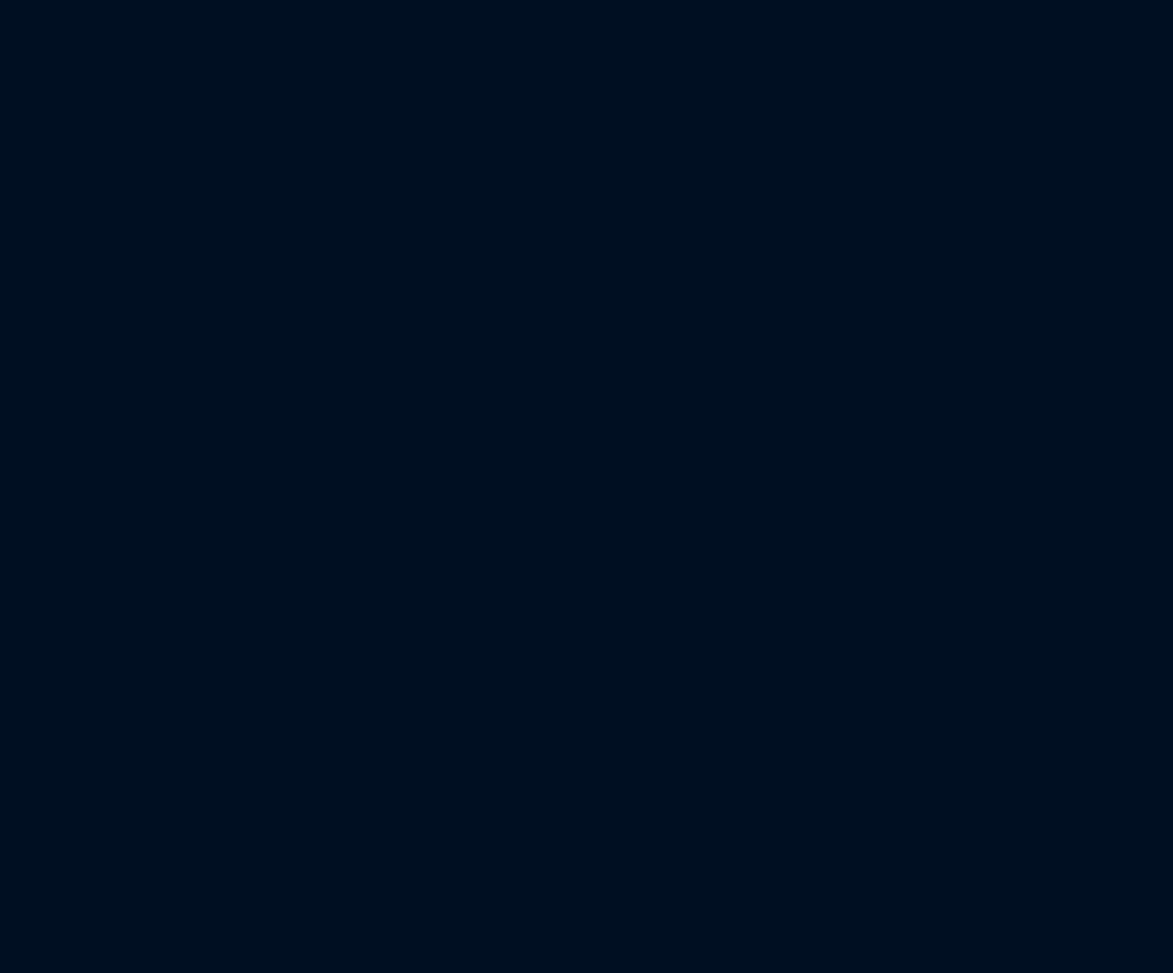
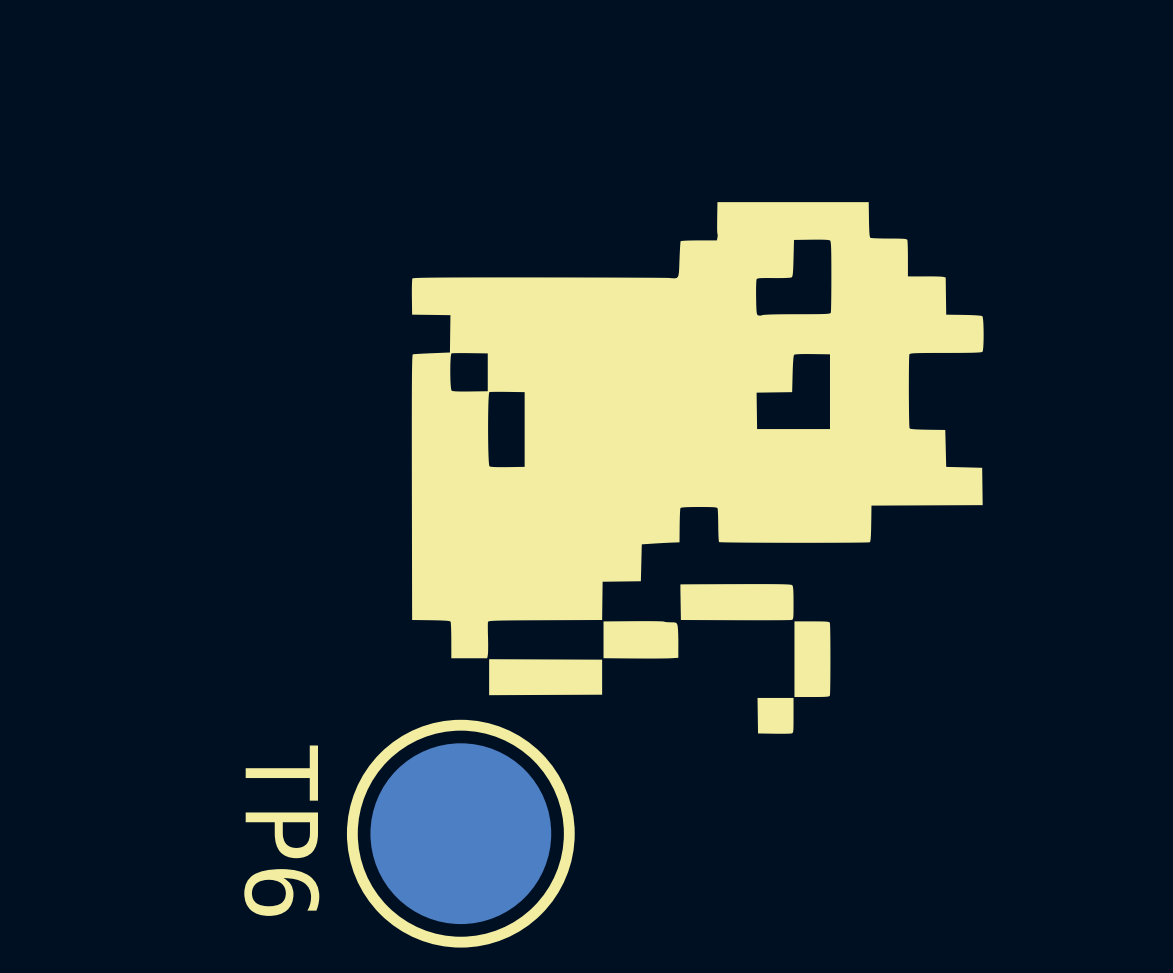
drawing: none -> [411, 202, 984, 734]
TP6: none -> (460, 833)

